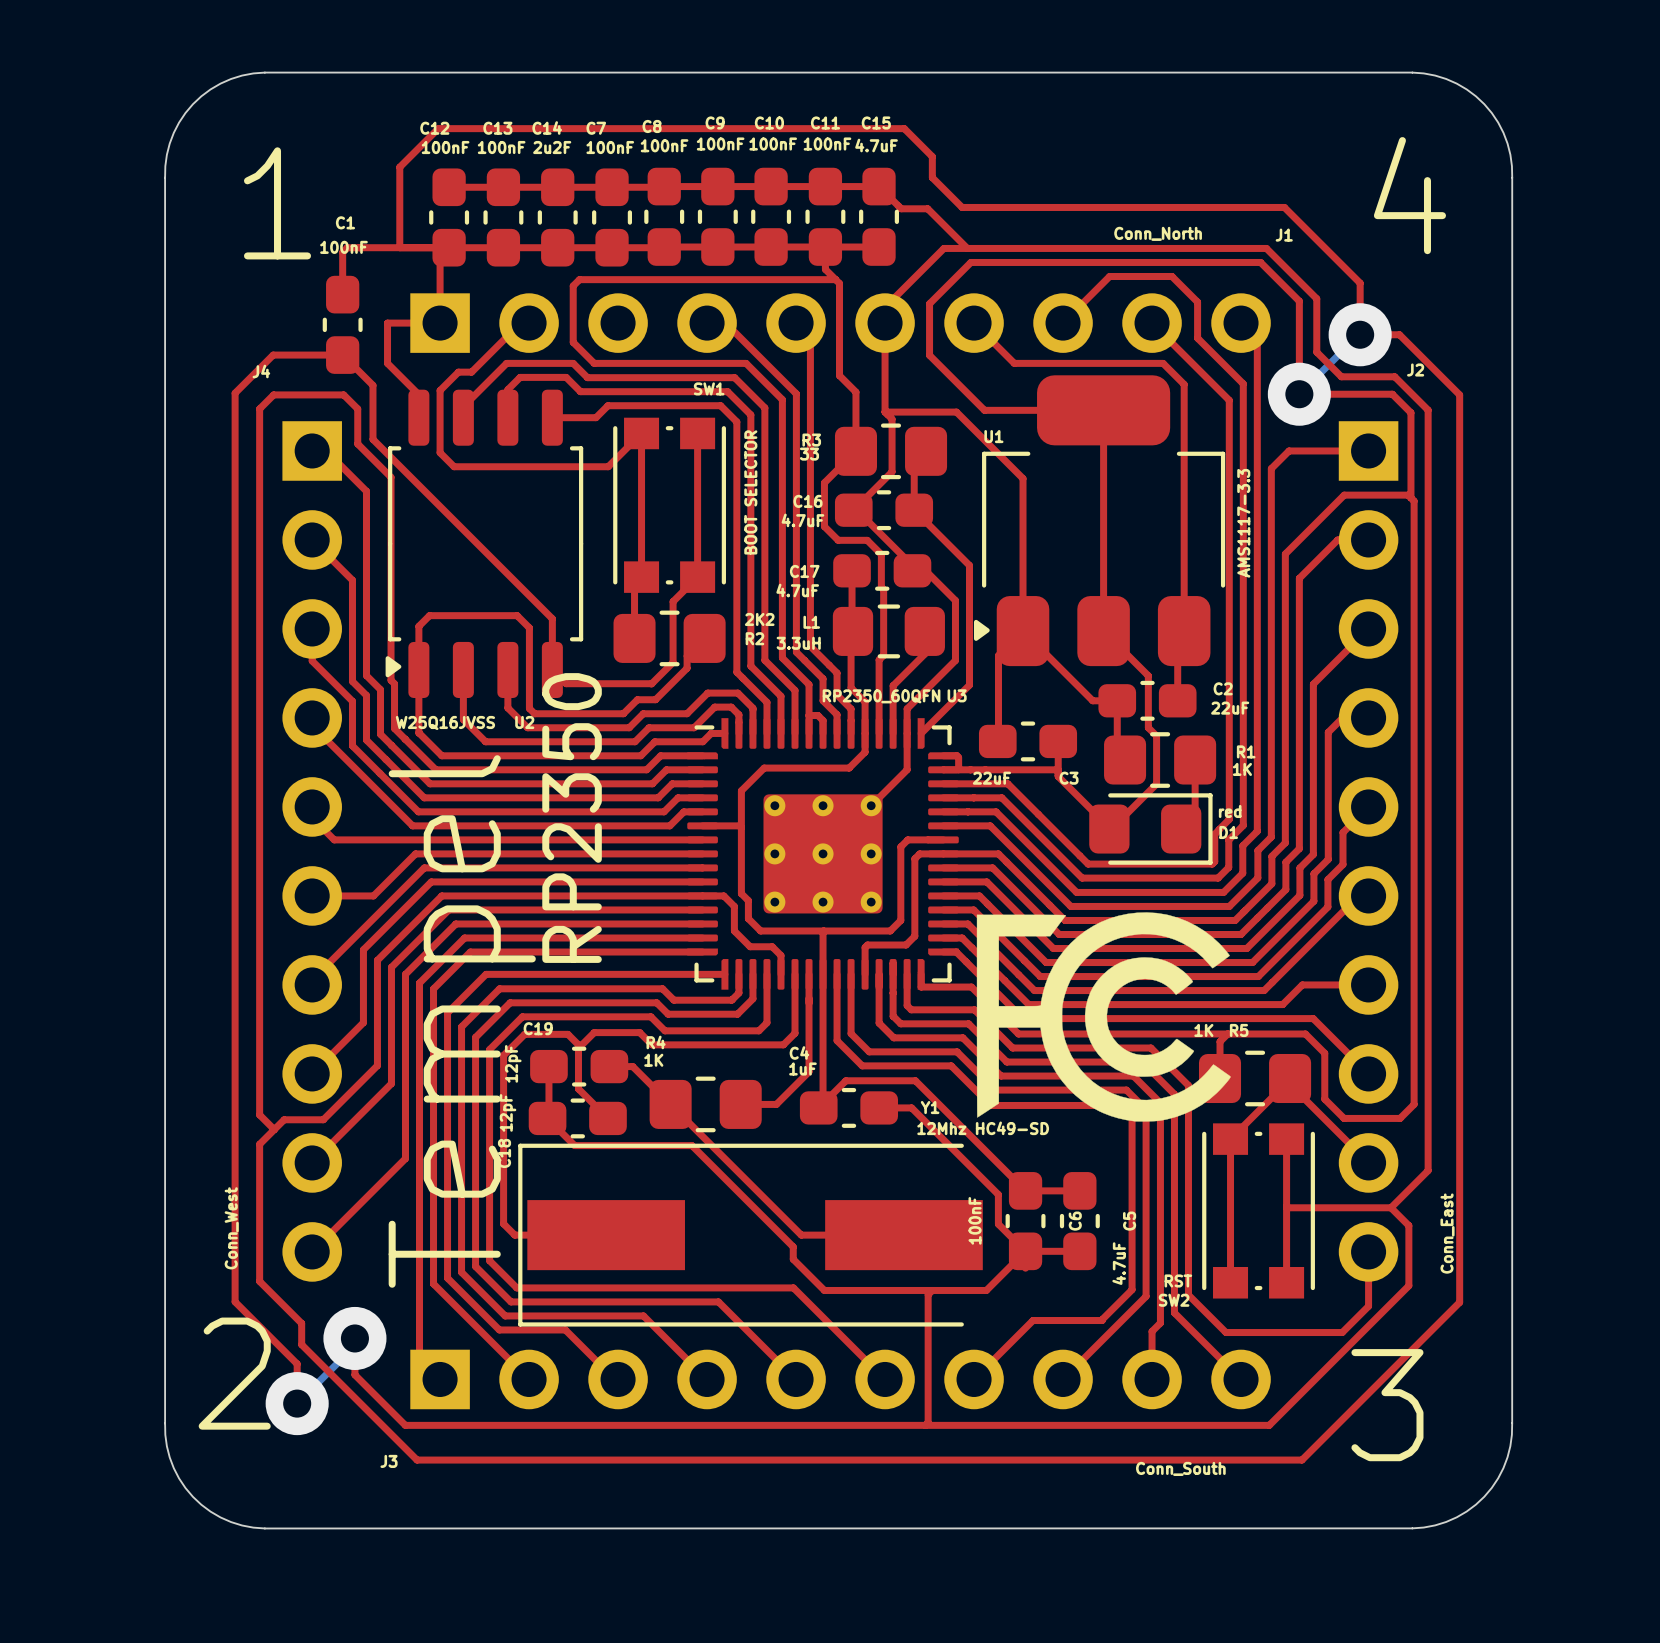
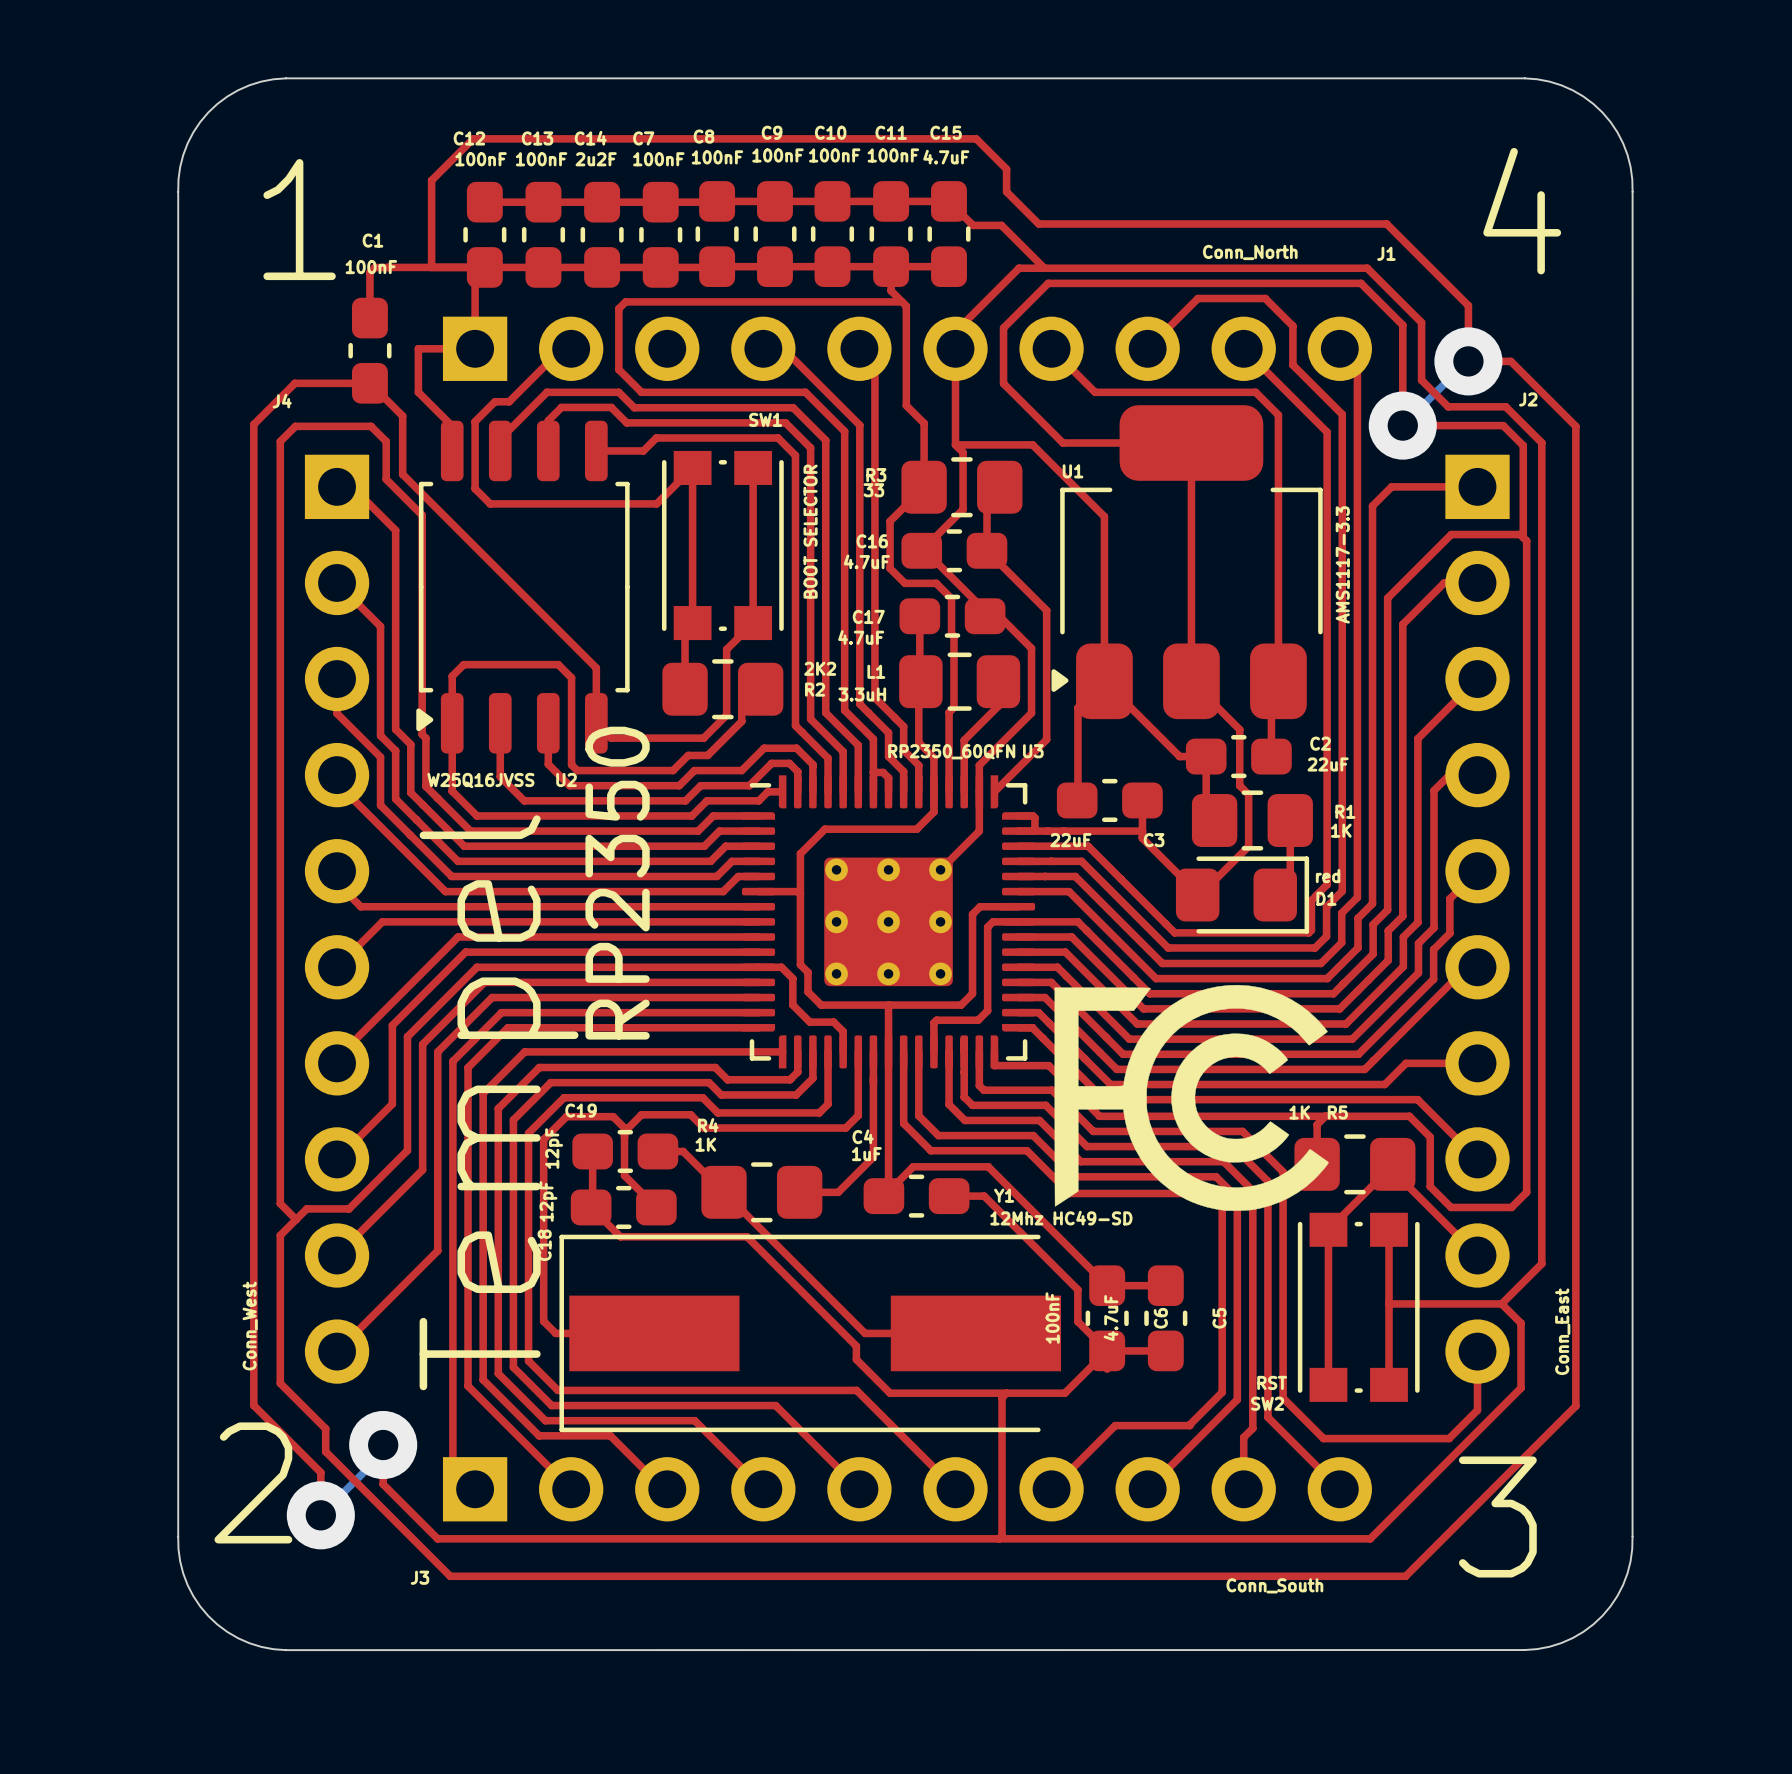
top track: (415, 853) (373, 895) (312, 895) -> (448, 921) (382, 921) (337, 967)
C5 value position: 4.7uF (1119, 1263) -> 4.7uF (1111, 1318)

